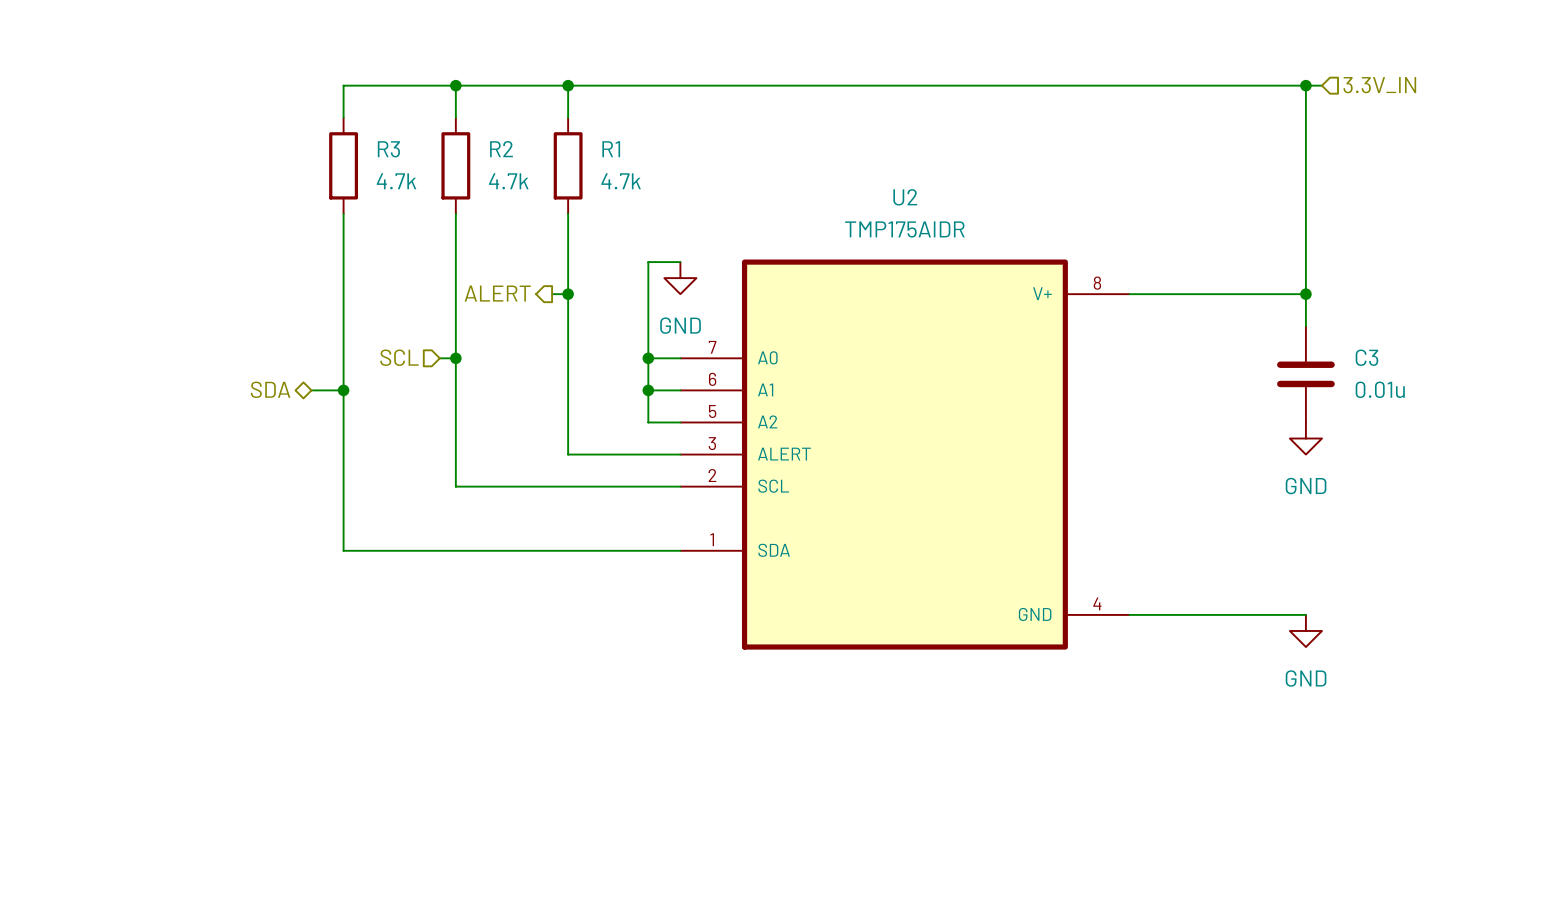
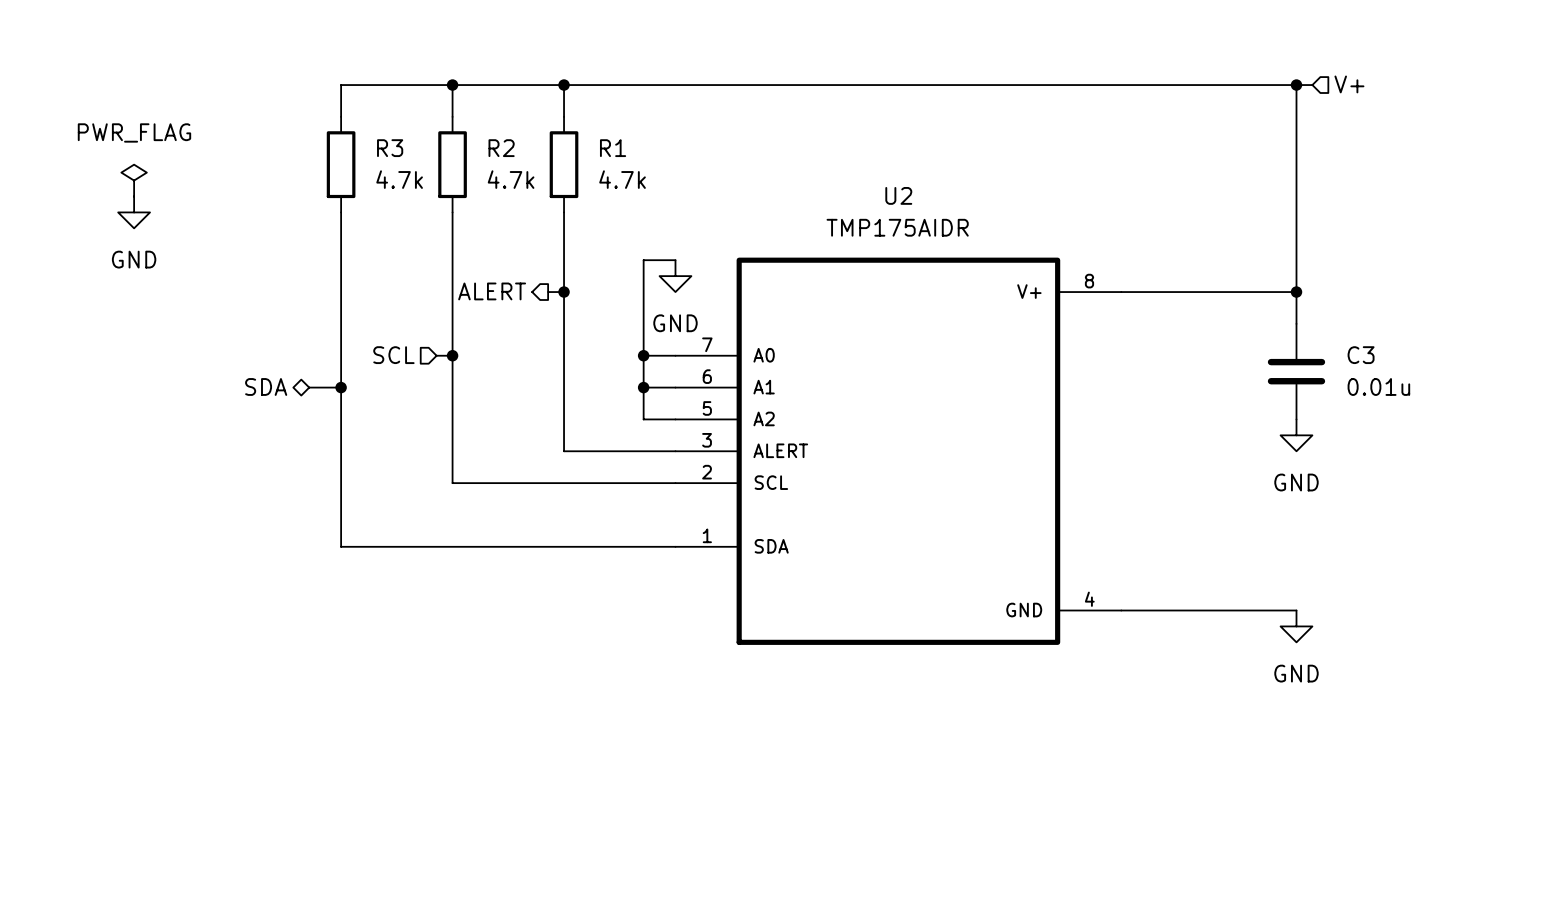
hierarchical label: 3.3V_IN (1379, 85) -> V+ (1349, 84)
power symbol: none -> PWR_FLAG (134, 180)
power symbol: none -> GND (134, 212)

